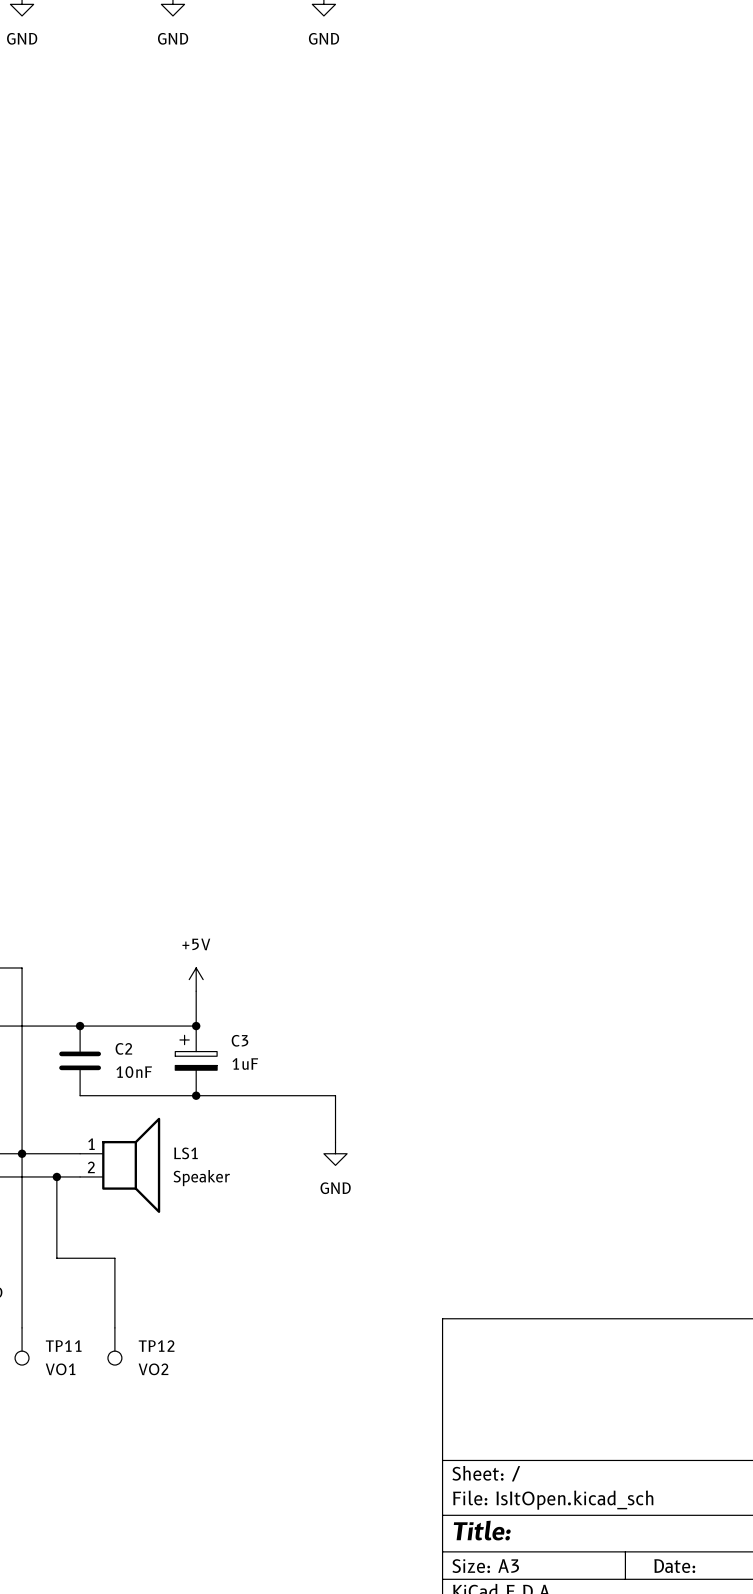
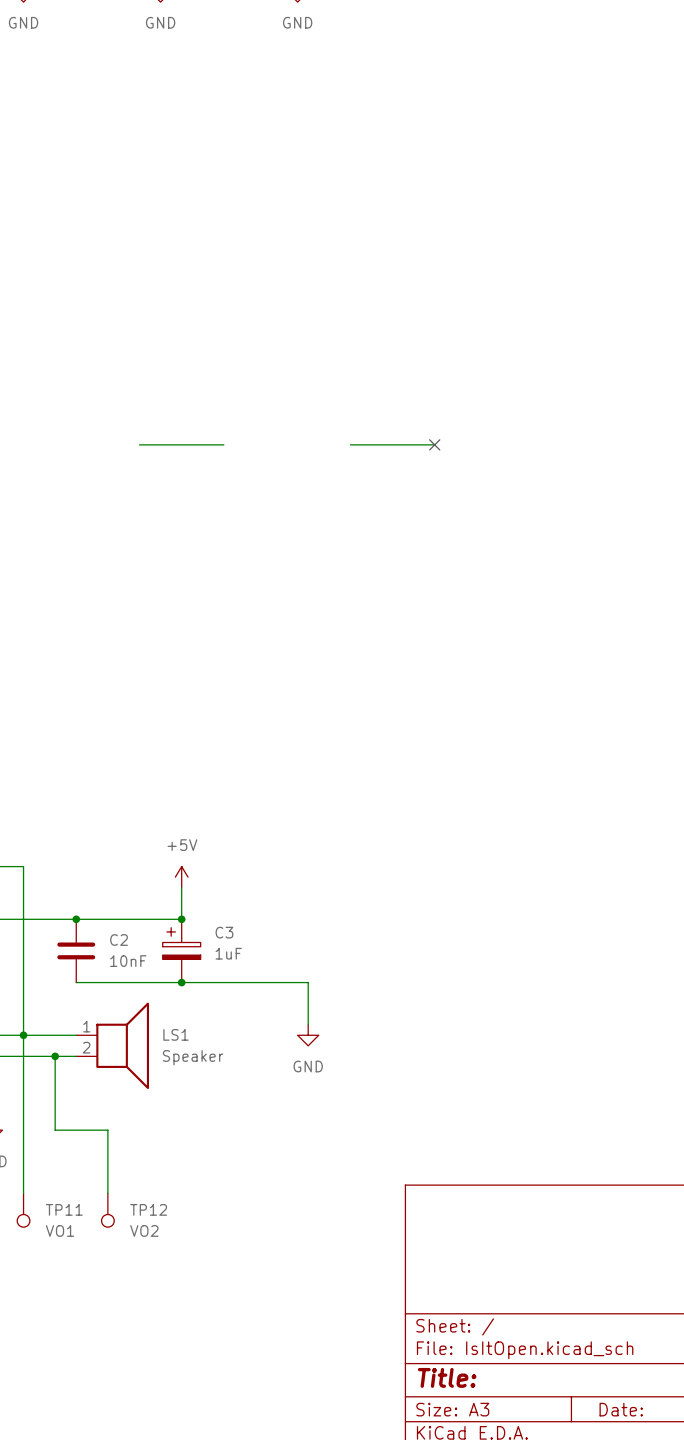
wire: none -> (139, 444) (223, 444)
wire: none -> (350, 444) (434, 444)
no-connect mark: none -> (434, 444)

